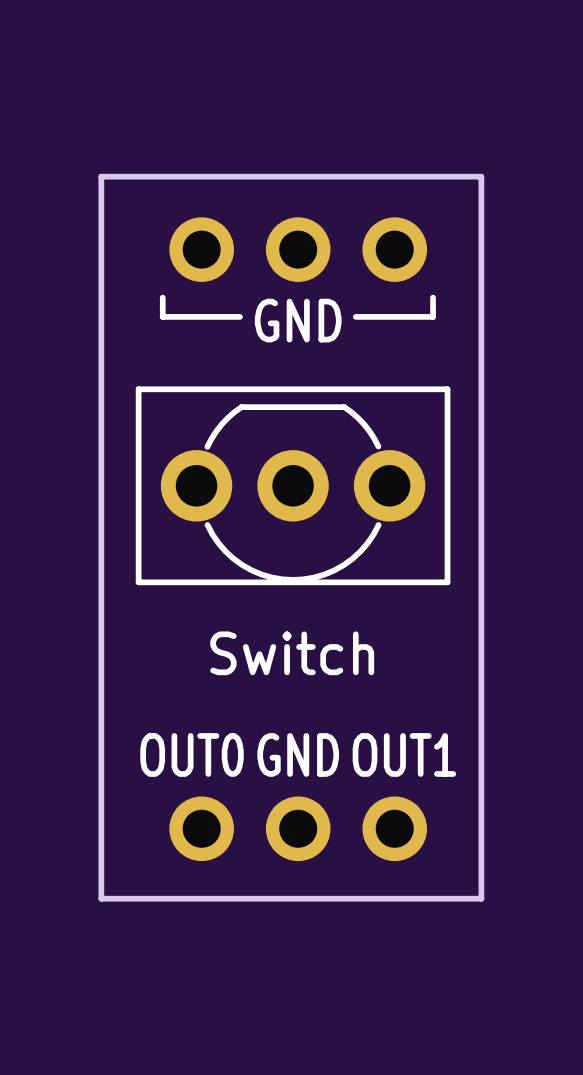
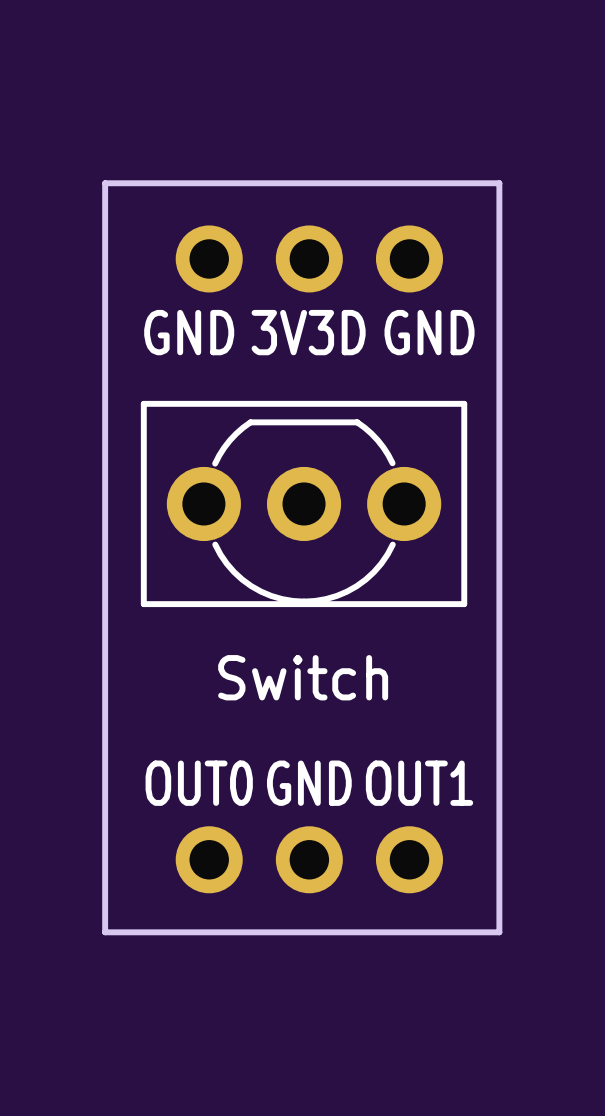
line: (162, 297) (162, 316) (239, 316) -> none
line: (433, 297) (433, 316) (355, 316) -> none
text: none -> GND (189, 332)
text: GND (298, 320) -> 3V3D (308, 332)
text: none -> GND (429, 332)

